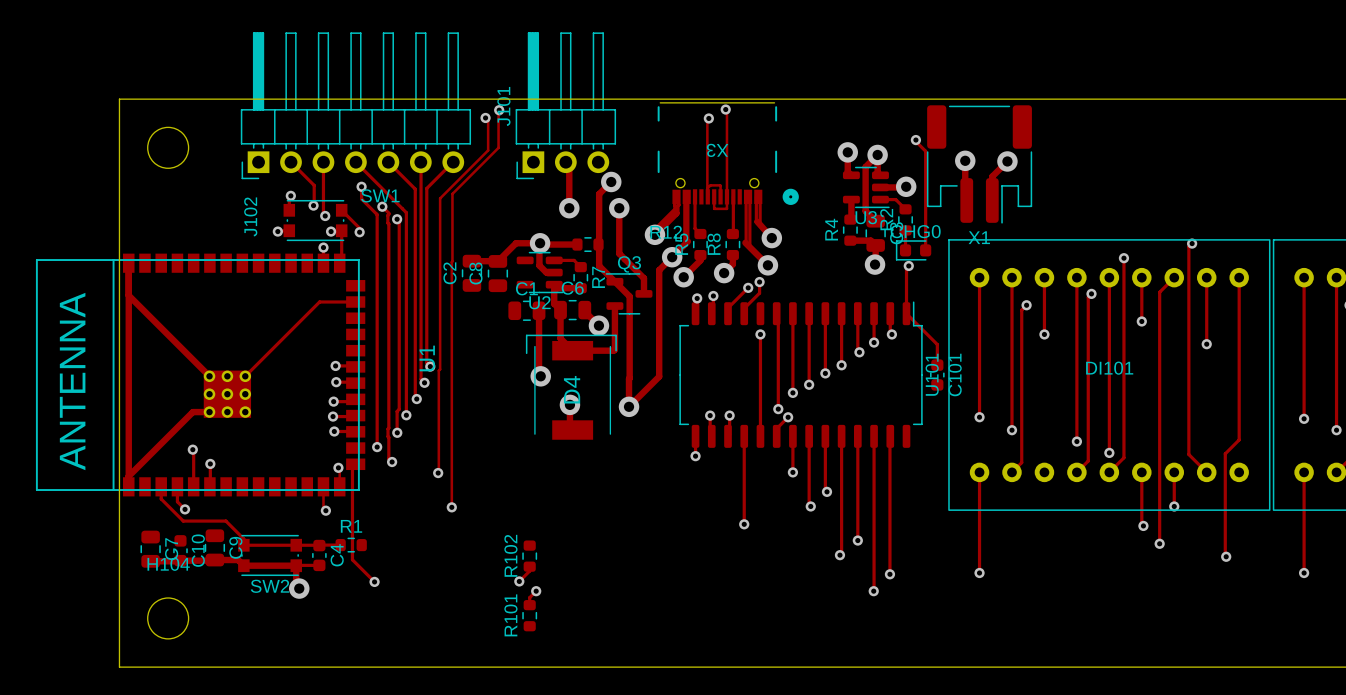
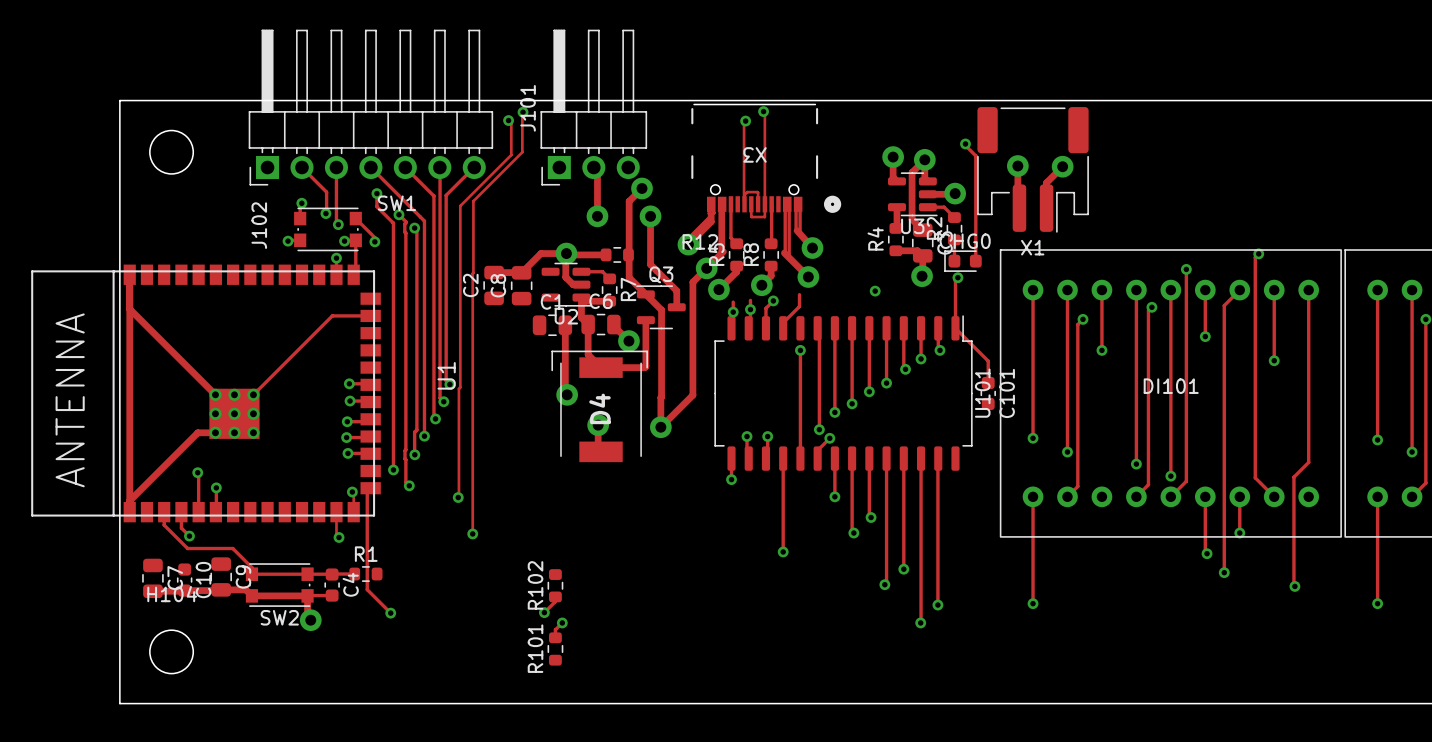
via: none -> (875, 291)
via: (759, 282) -> none
track: none -> (750, 300) (750, 309)
via: none -> (773, 300)
track: (748, 287) (728, 308) -> (773, 300) (765, 308) (765, 322)
via: (748, 287) -> none
track: none -> (733, 302) (733, 312)

